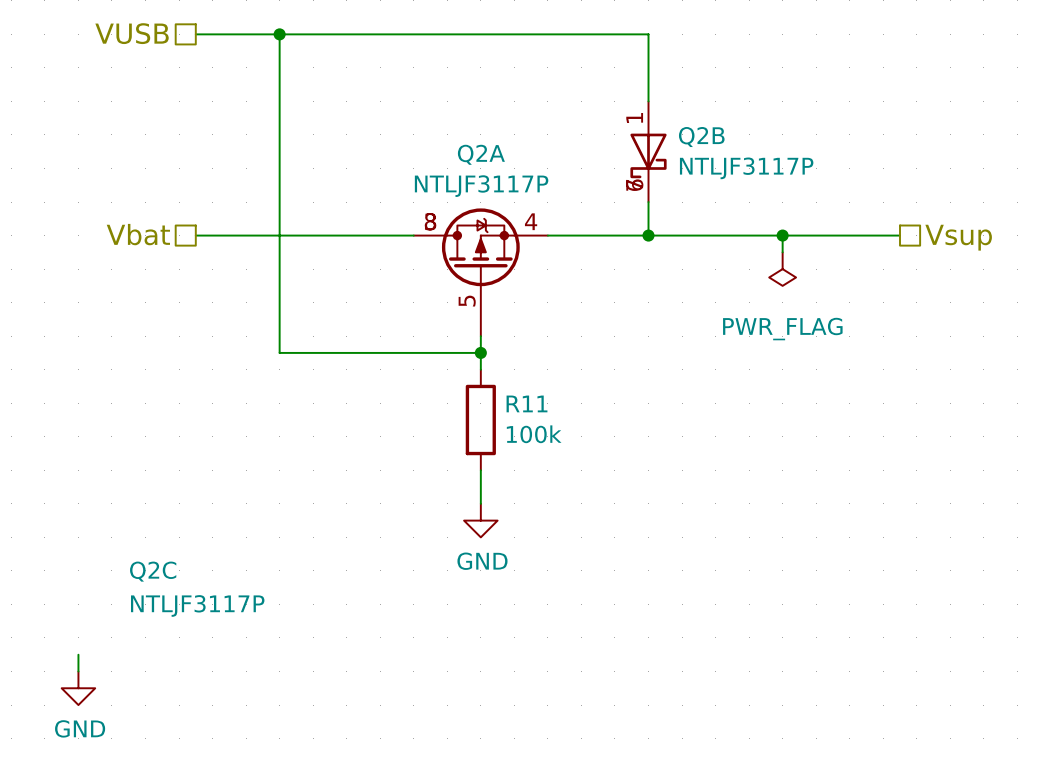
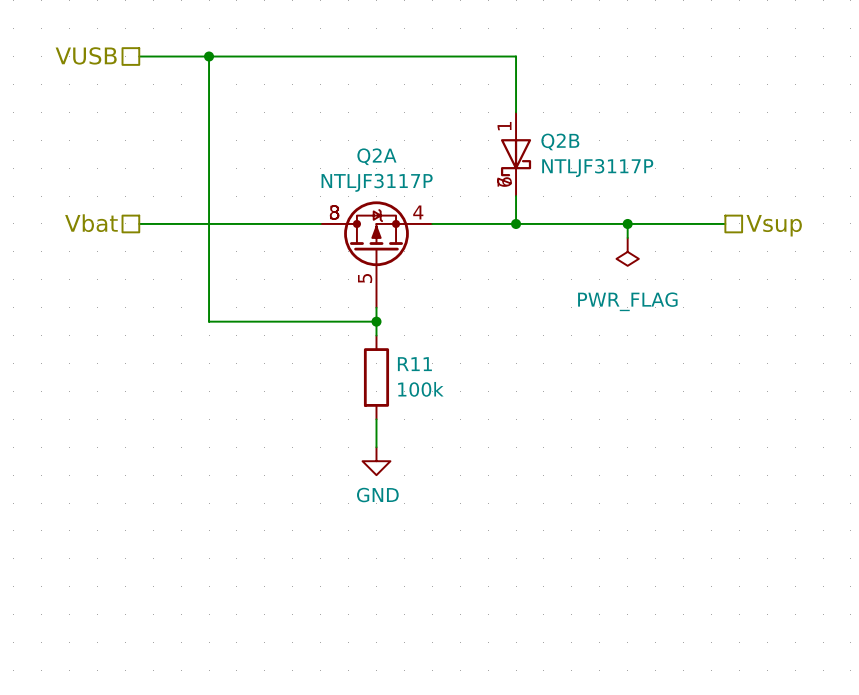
Q2C: NTLJF3117P (197, 589) -> none
wire: (78, 654) (78, 671) -> none
power symbol: GND (78, 688) -> none

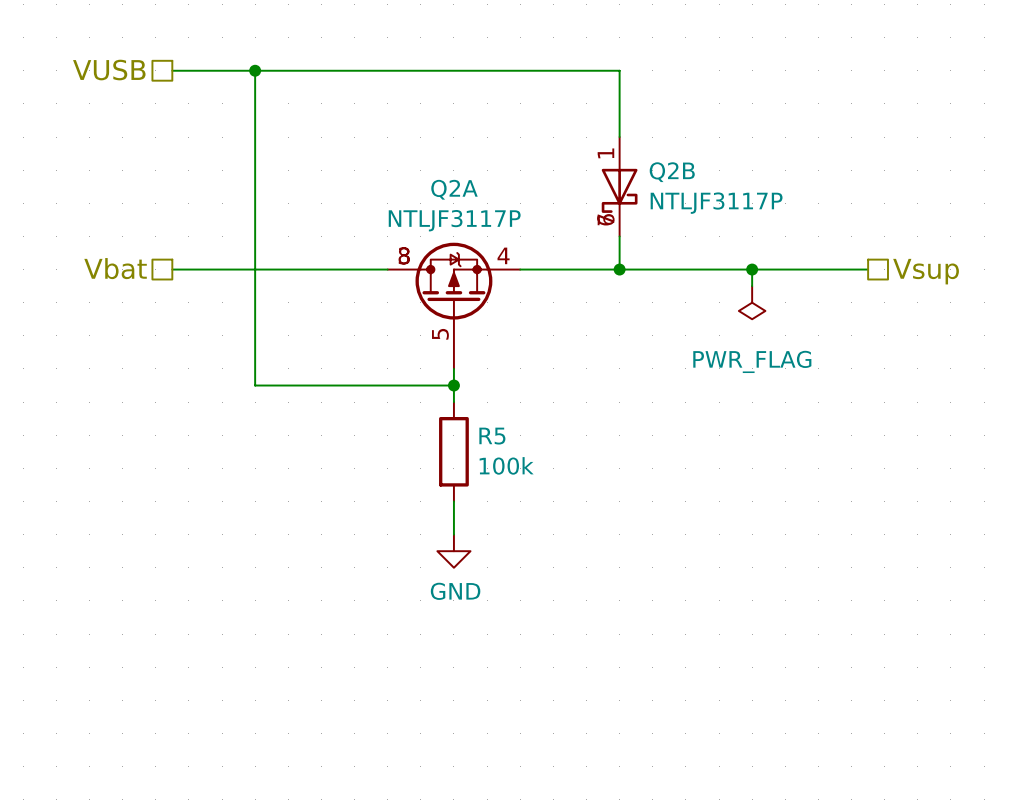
R11 name: R11 (414, 364) -> R5 (492, 436)

